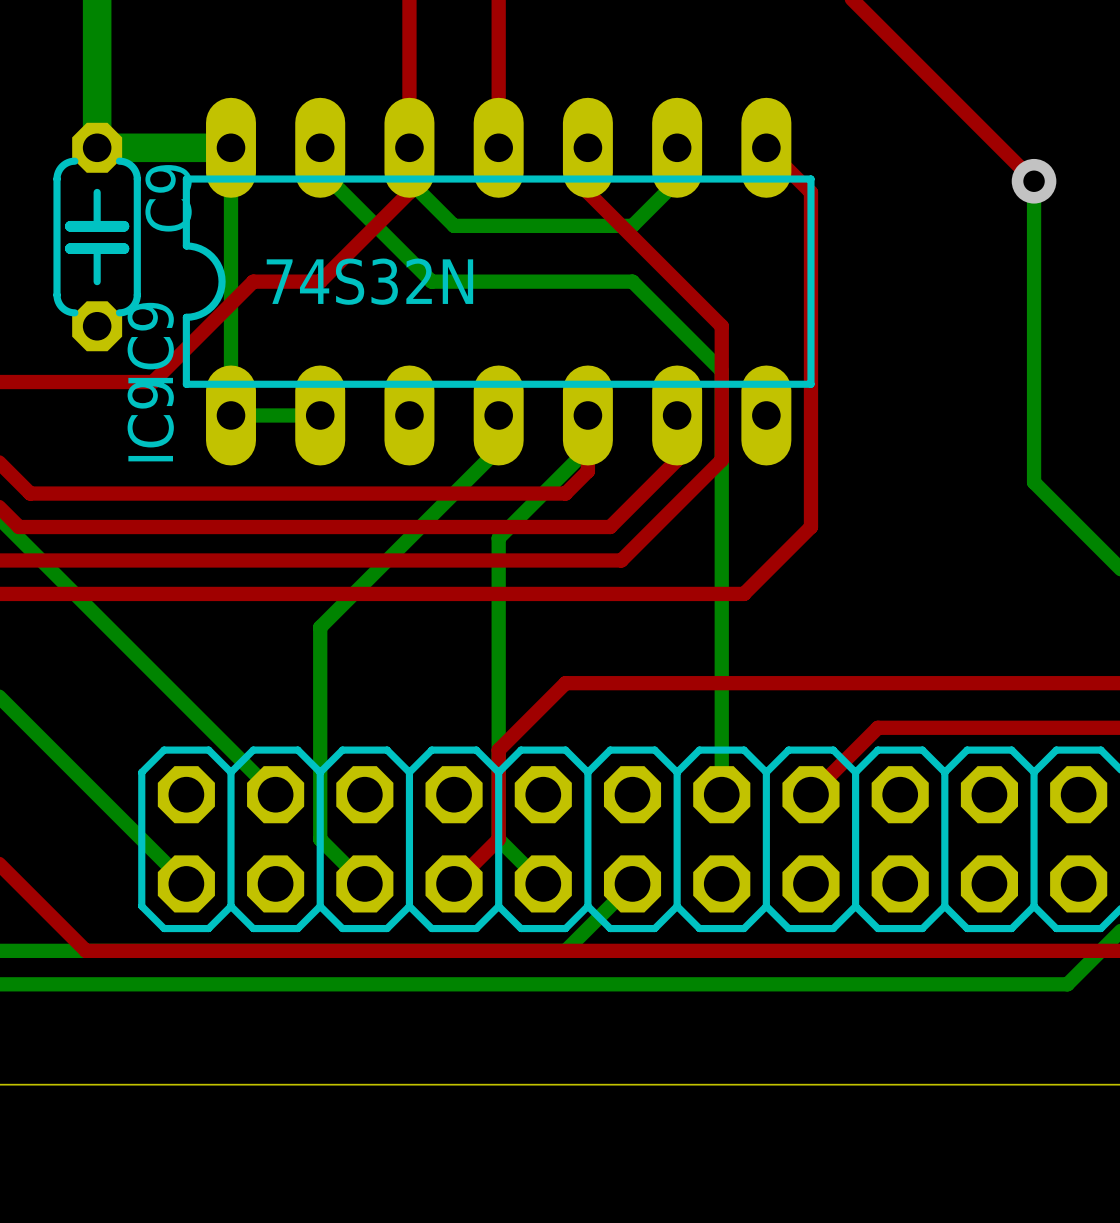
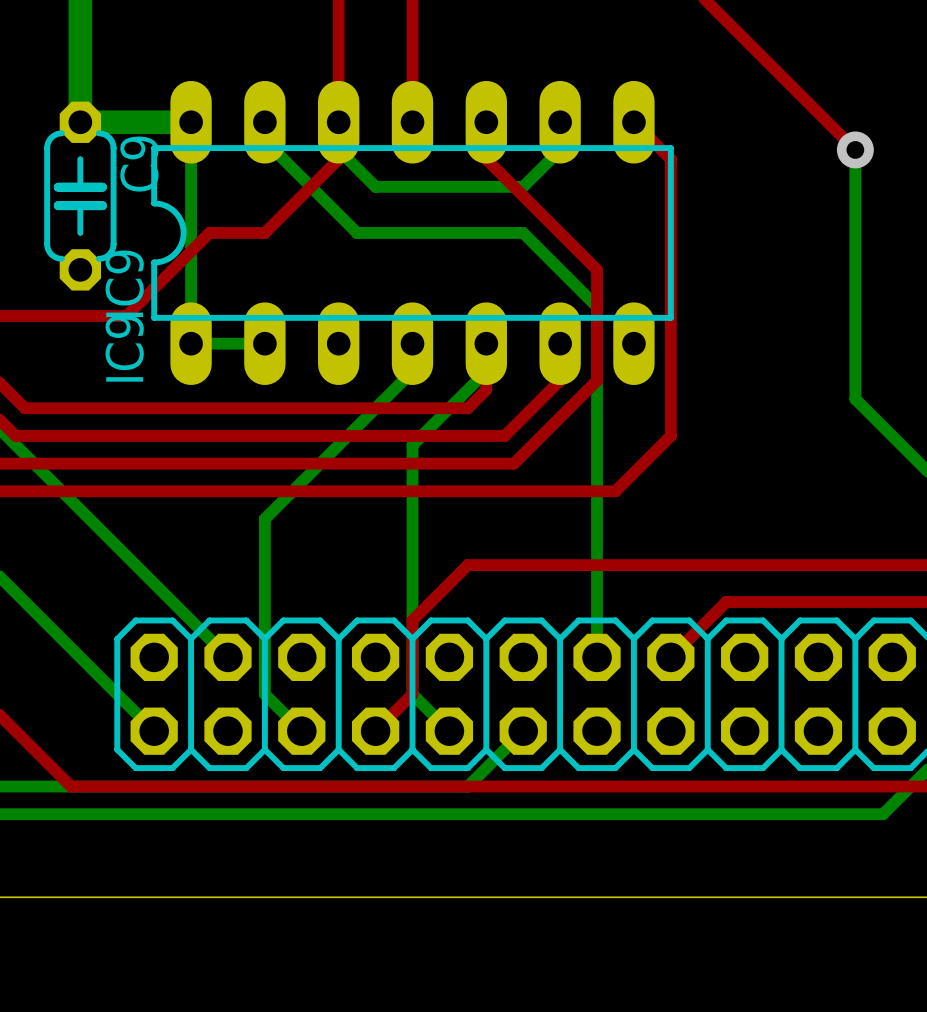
text: 74S32N (369, 281) -> none

